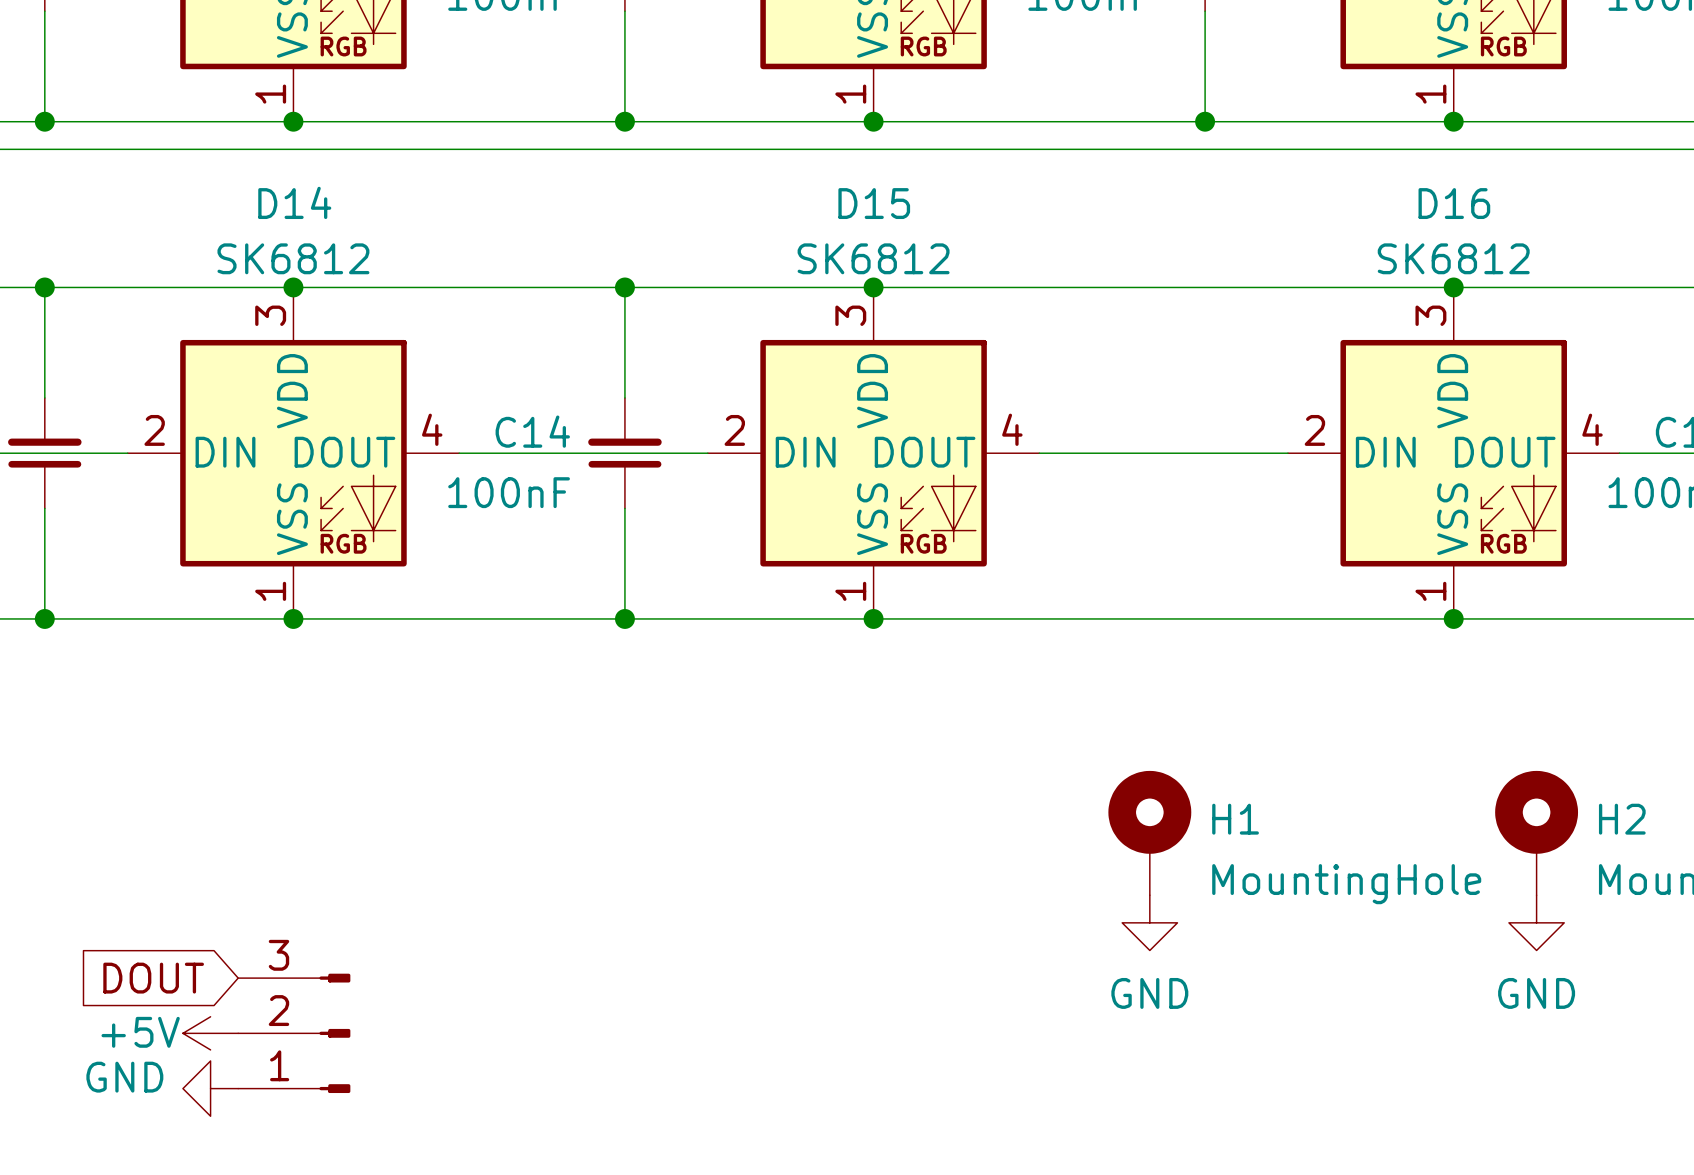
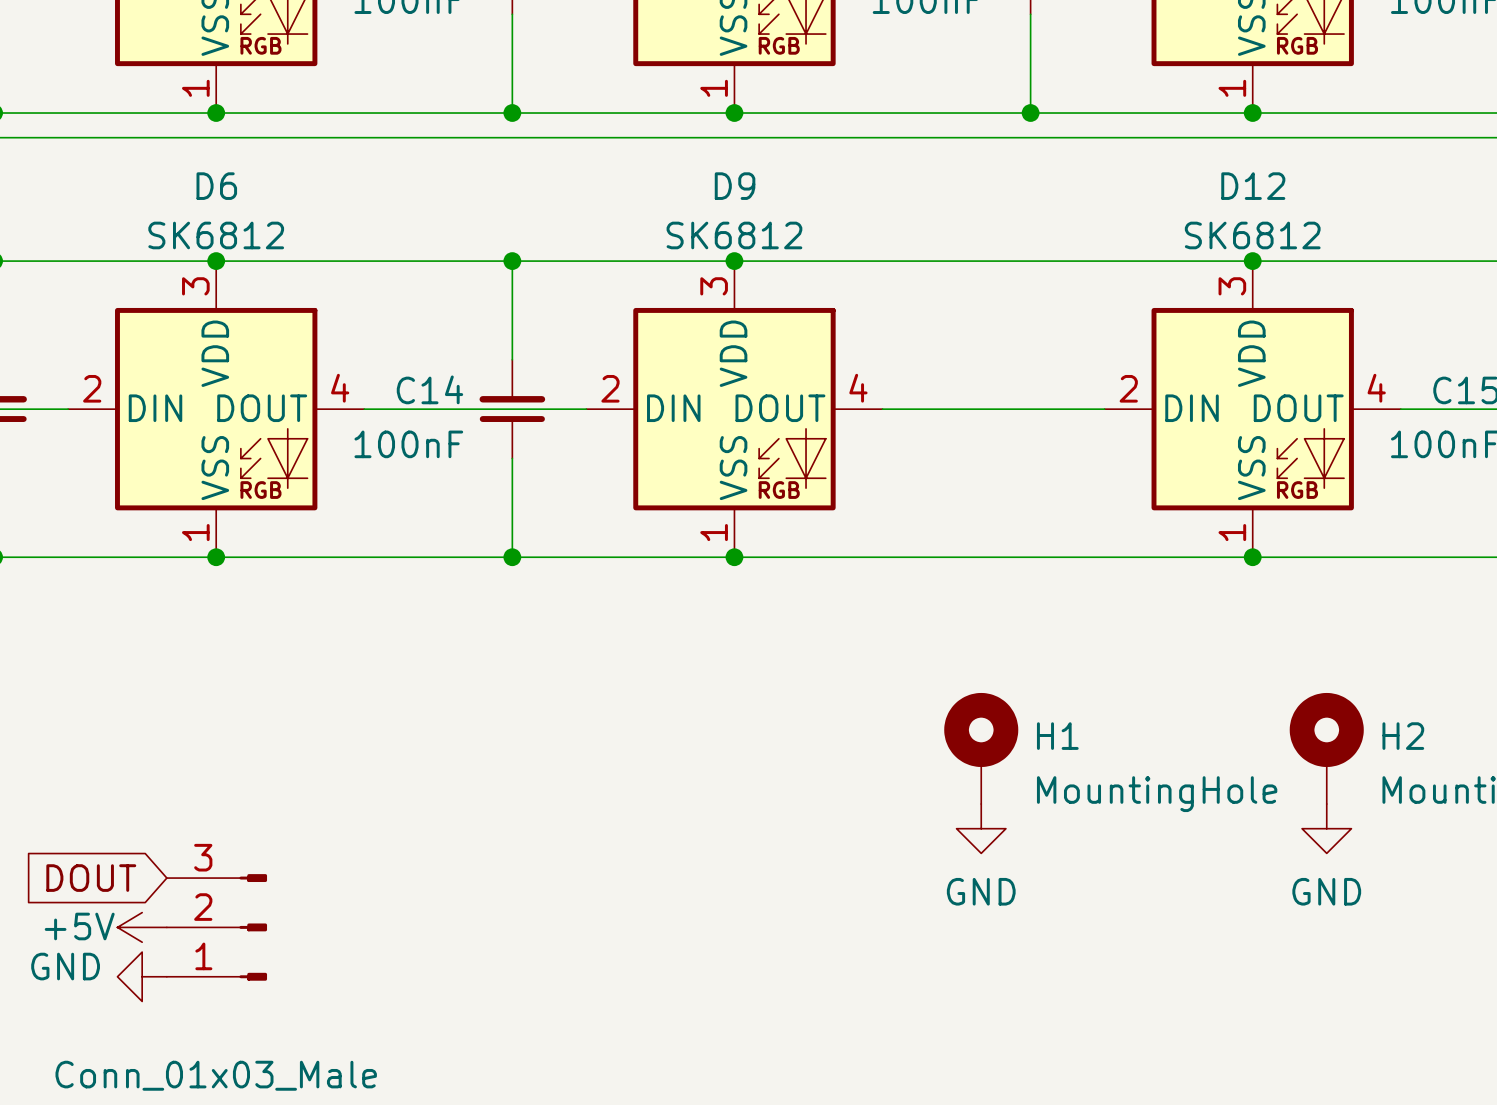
D14 name: D14 (294, 202) -> D6 (216, 186)
D15 name: D15 (874, 203) -> D9 (735, 186)
D16 name: D16 (1454, 203) -> D12 (1253, 186)

